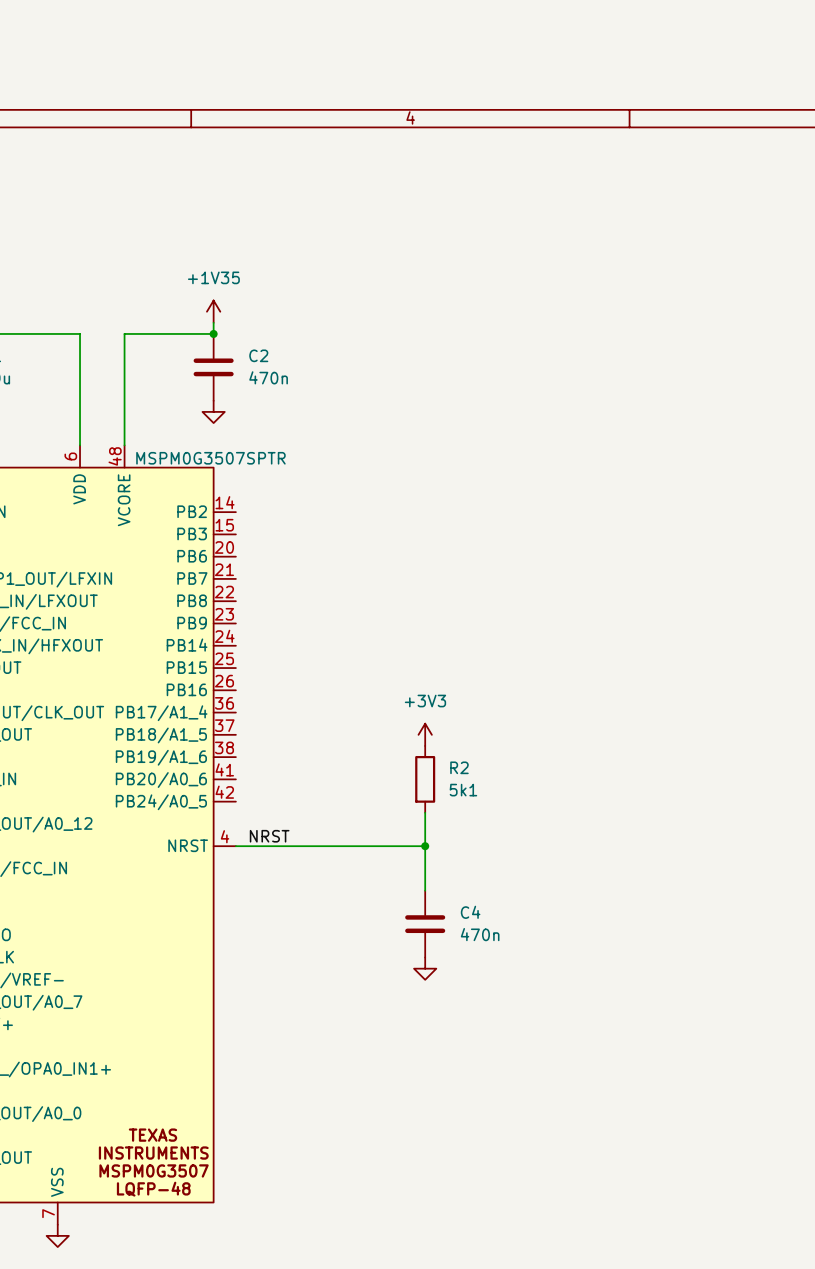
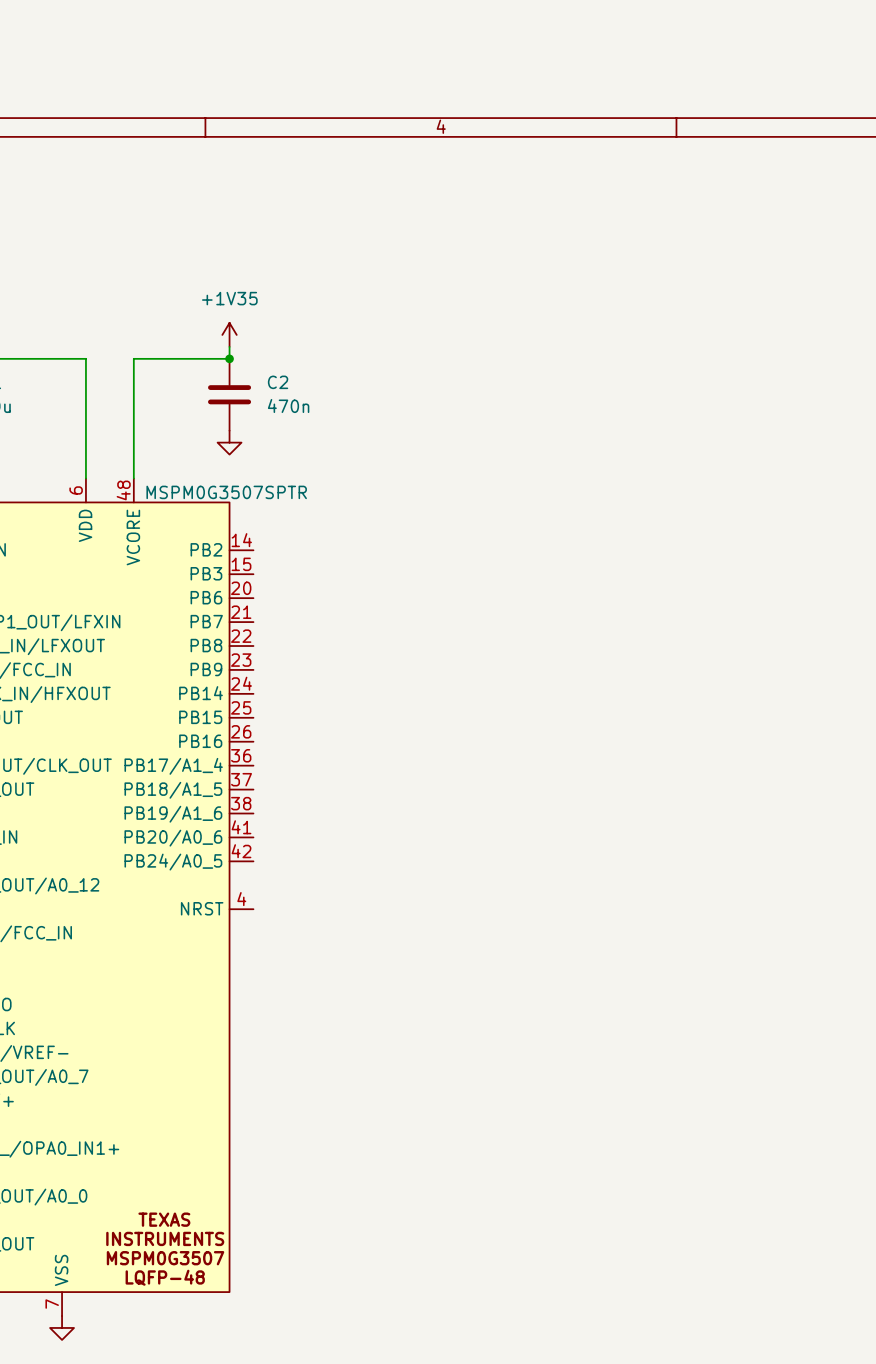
power symbol: +3V3 (425, 734) -> none
R2: 5k1 (425, 779) -> none
wire: (425, 812) (425, 890) -> none
label: NRST (269, 836) -> none
wire: (235, 846) (425, 846) -> none
junction: (425, 846) -> none
C4: 470n (425, 924) -> none
power symbol: (425, 968) -> none

